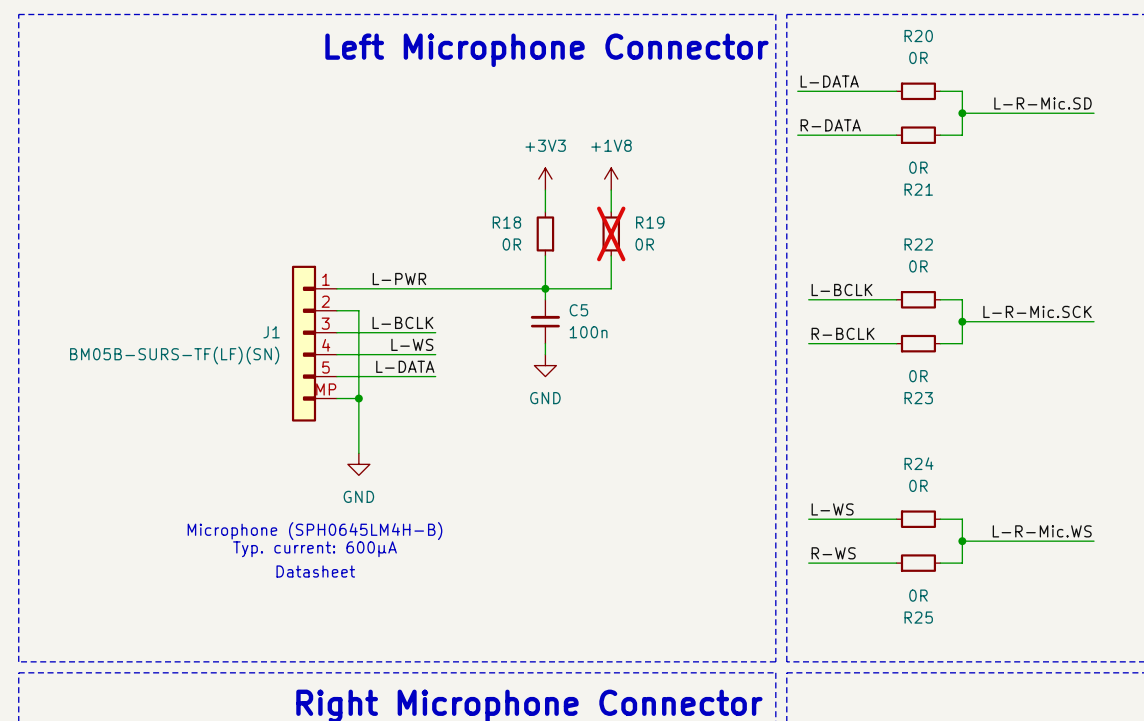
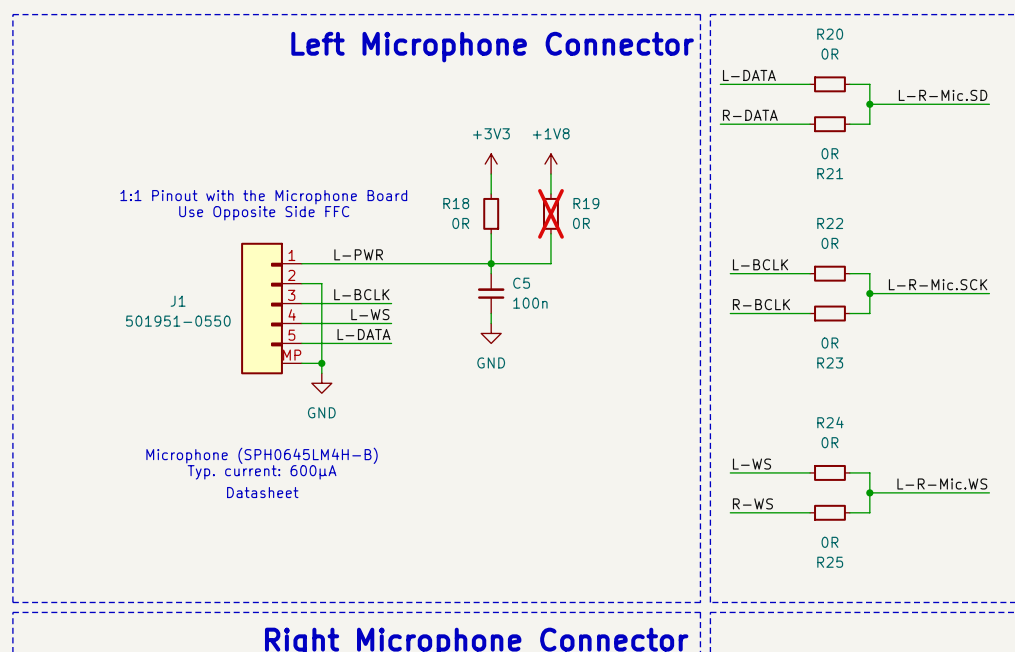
text: none -> 1:1 Pinout with the Microphone Board (263, 197)
text: none -> Use Opposite Side FFC (264, 213)
J1 symbol: [291, 265, 337, 422] -> [241, 242, 302, 375]
J1 name position: J1 (271, 332) -> J1 (178, 301)
J1 text: BM05B-SURS-TF(LF)(SN) (174, 355) -> 501951-0550 (178, 321)
wire: (358, 409) (358, 453) -> none
power symbol position: GND (358, 464) -> GND (321, 383)
text position: Microphone (SPH0645LM4H-B) (314, 531) -> Microphone (SPH0645LM4H-B) (262, 455)
text position: Typ. current: 600µA (314, 549) -> Typ. current: 600µA (262, 472)
text position: Datasheet (315, 571) -> Datasheet (262, 492)

